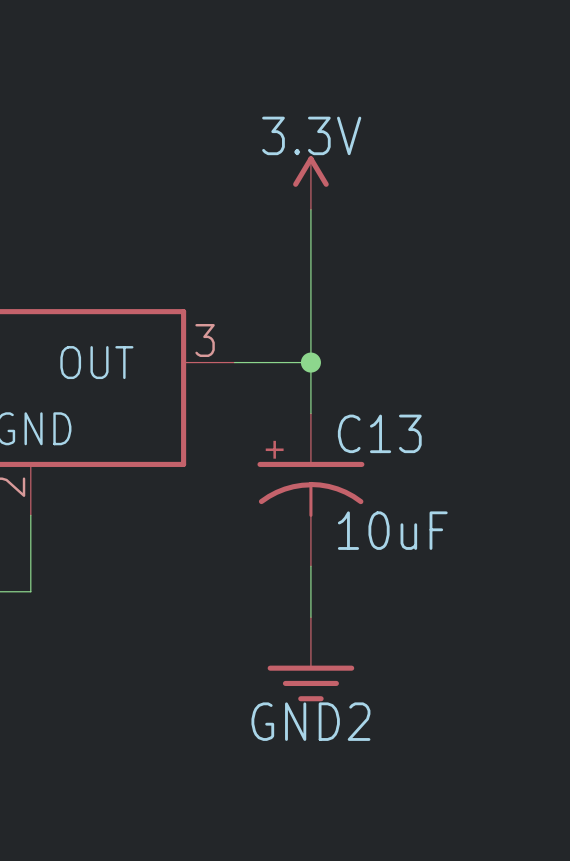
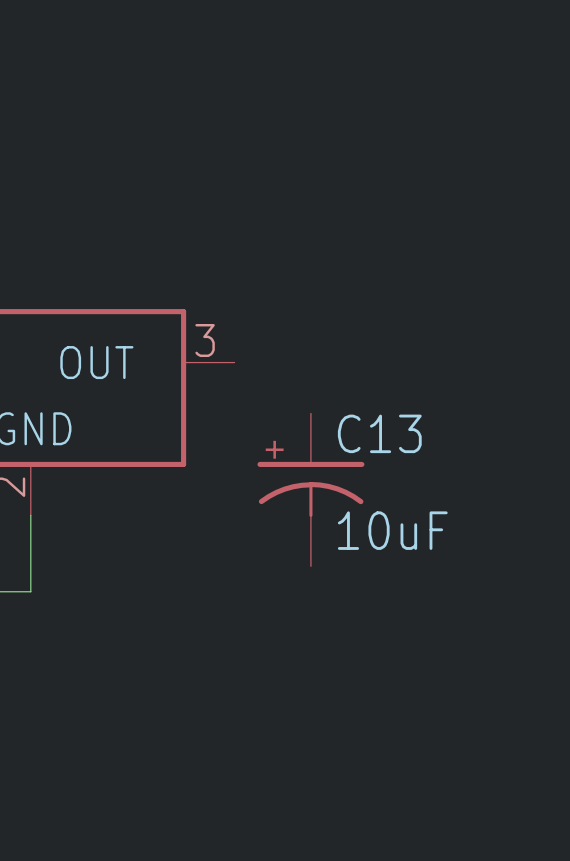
power symbol: 3.3V (310, 183) -> none
wire: (310, 209) (310, 413) -> none
wire: (234, 362) (310, 362) -> none
junction: (310, 362) -> none
wire: (310, 566) (310, 617) -> none
power symbol: GND2 (310, 659) -> none

